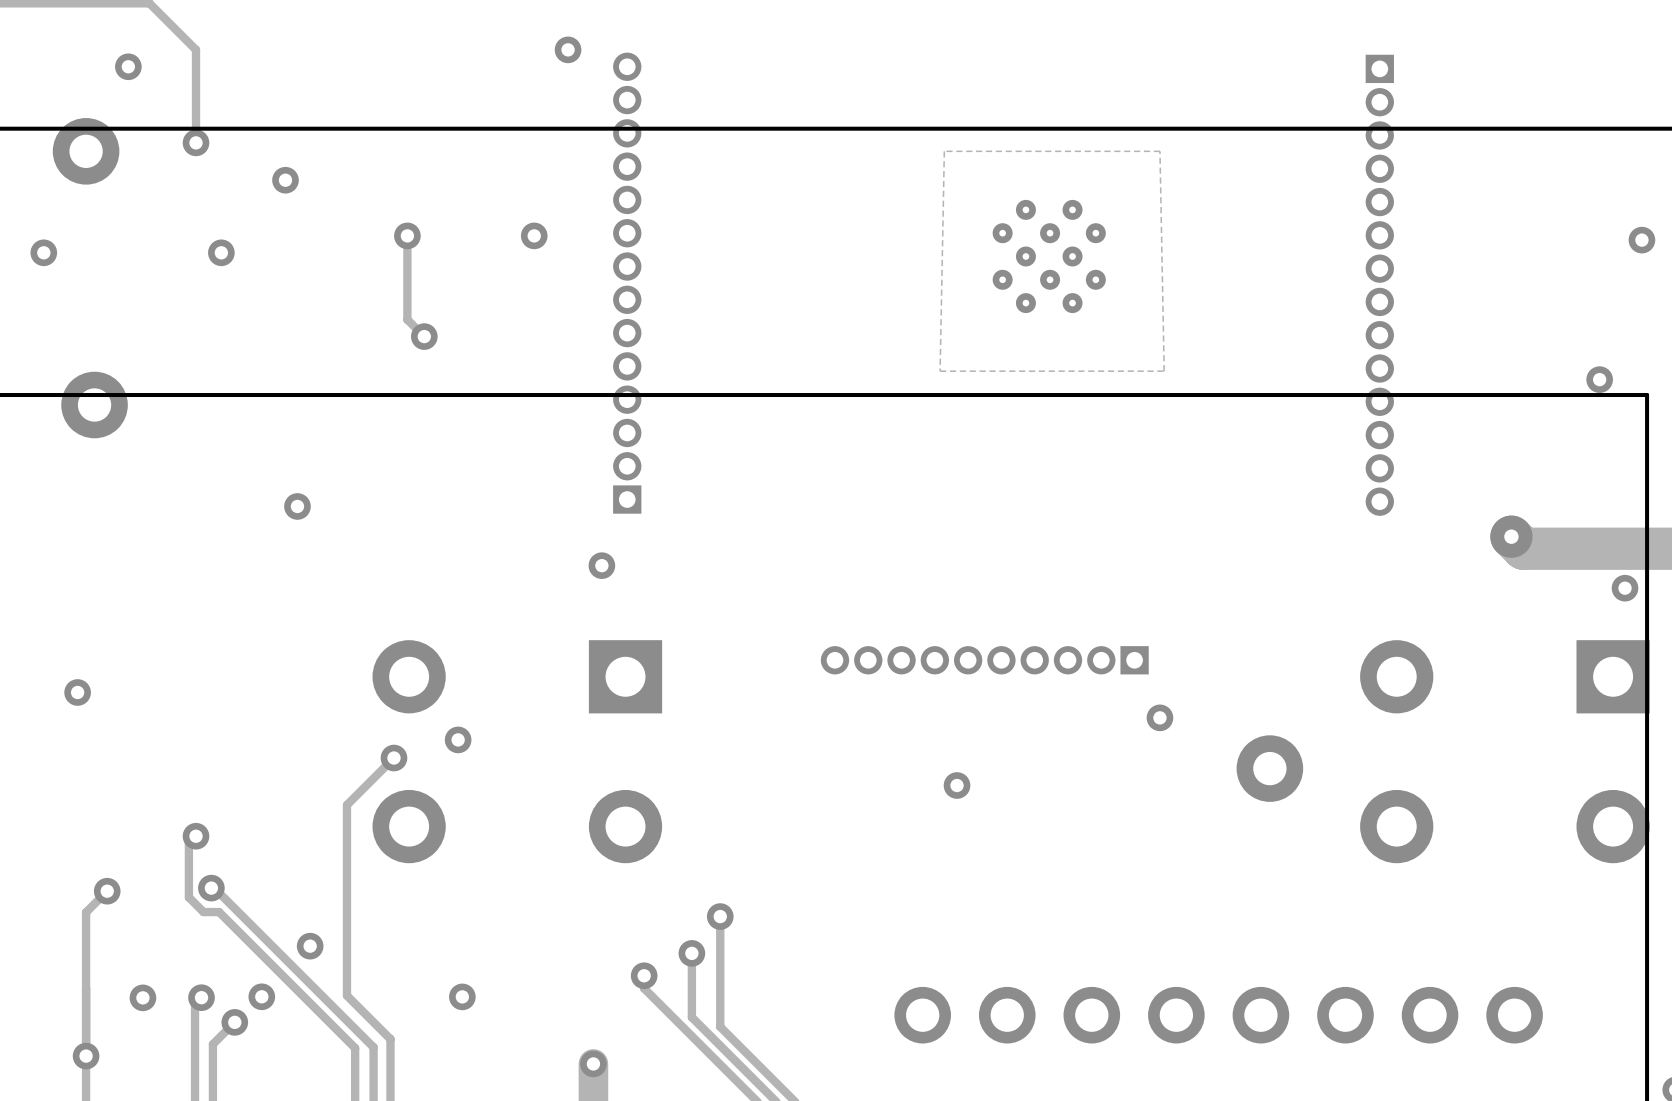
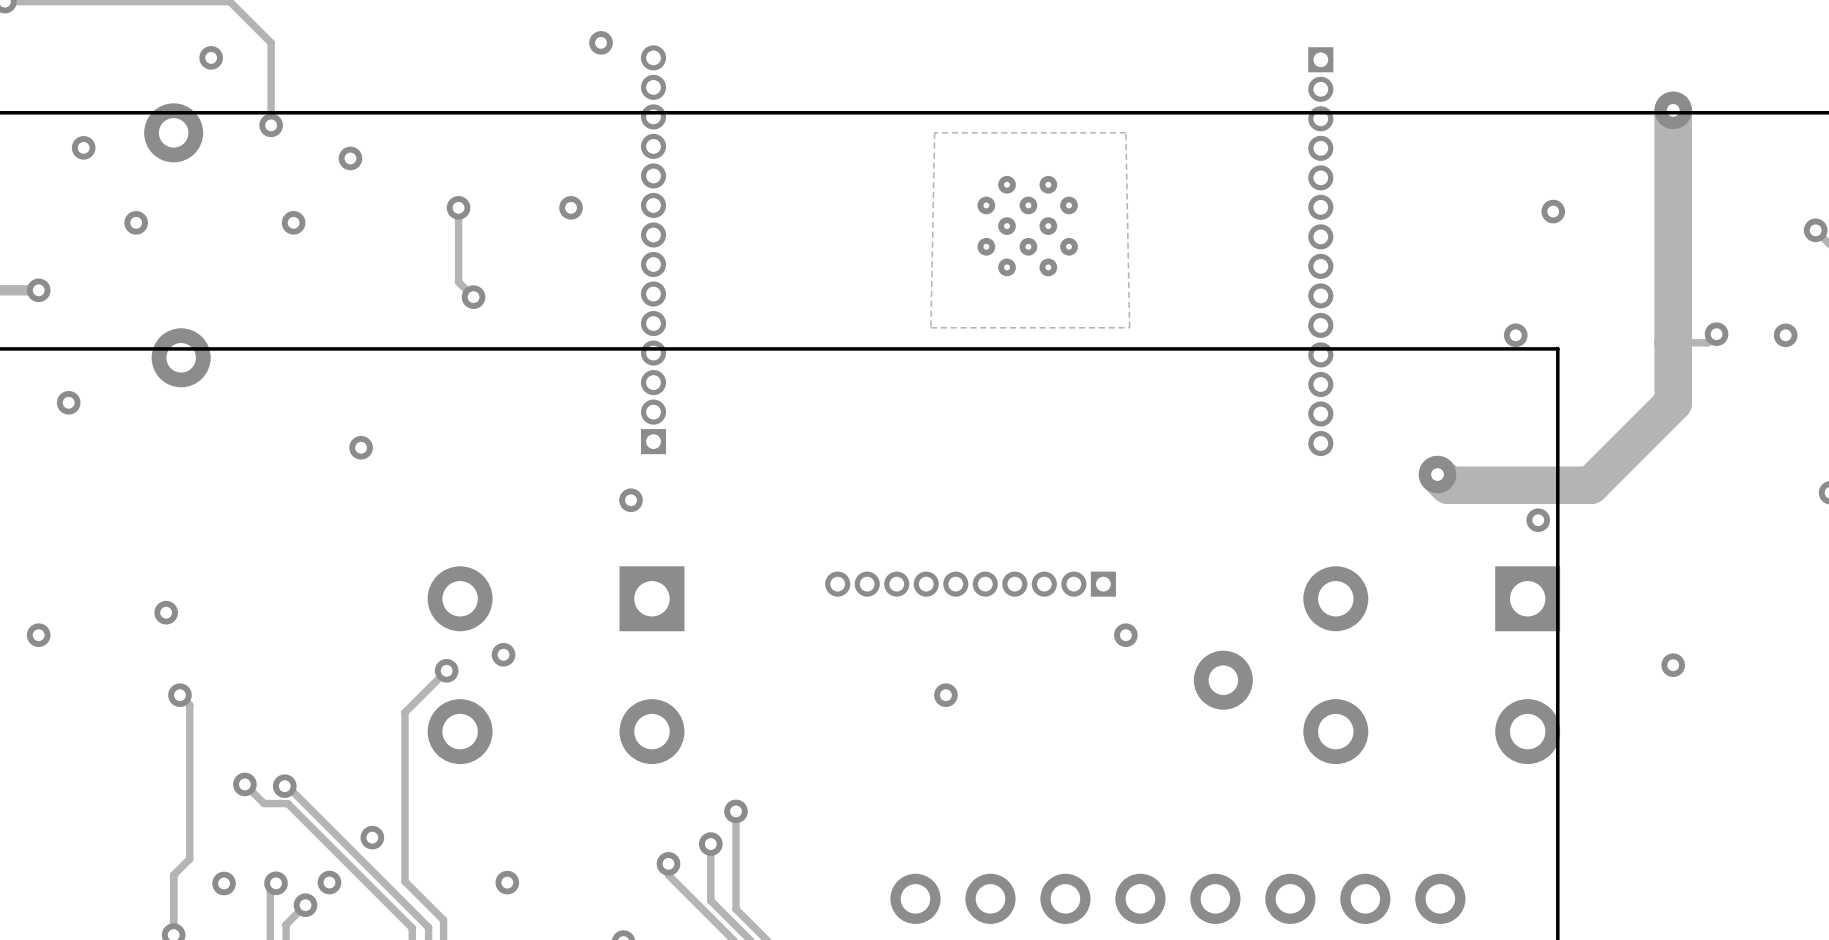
via: none -> (179, 695)
track: (196, 836) (188, 843) (188, 897) (203, 912) (219, 912) -> (244, 784) (264, 803) (287, 803) (291, 807)
via: (196, 836) -> none
via: none -> (244, 784)
track: (107, 891) (86, 912) (86, 988) -> (179, 695) (189, 704) (189, 859) (173, 875)
via: (107, 891) -> none

